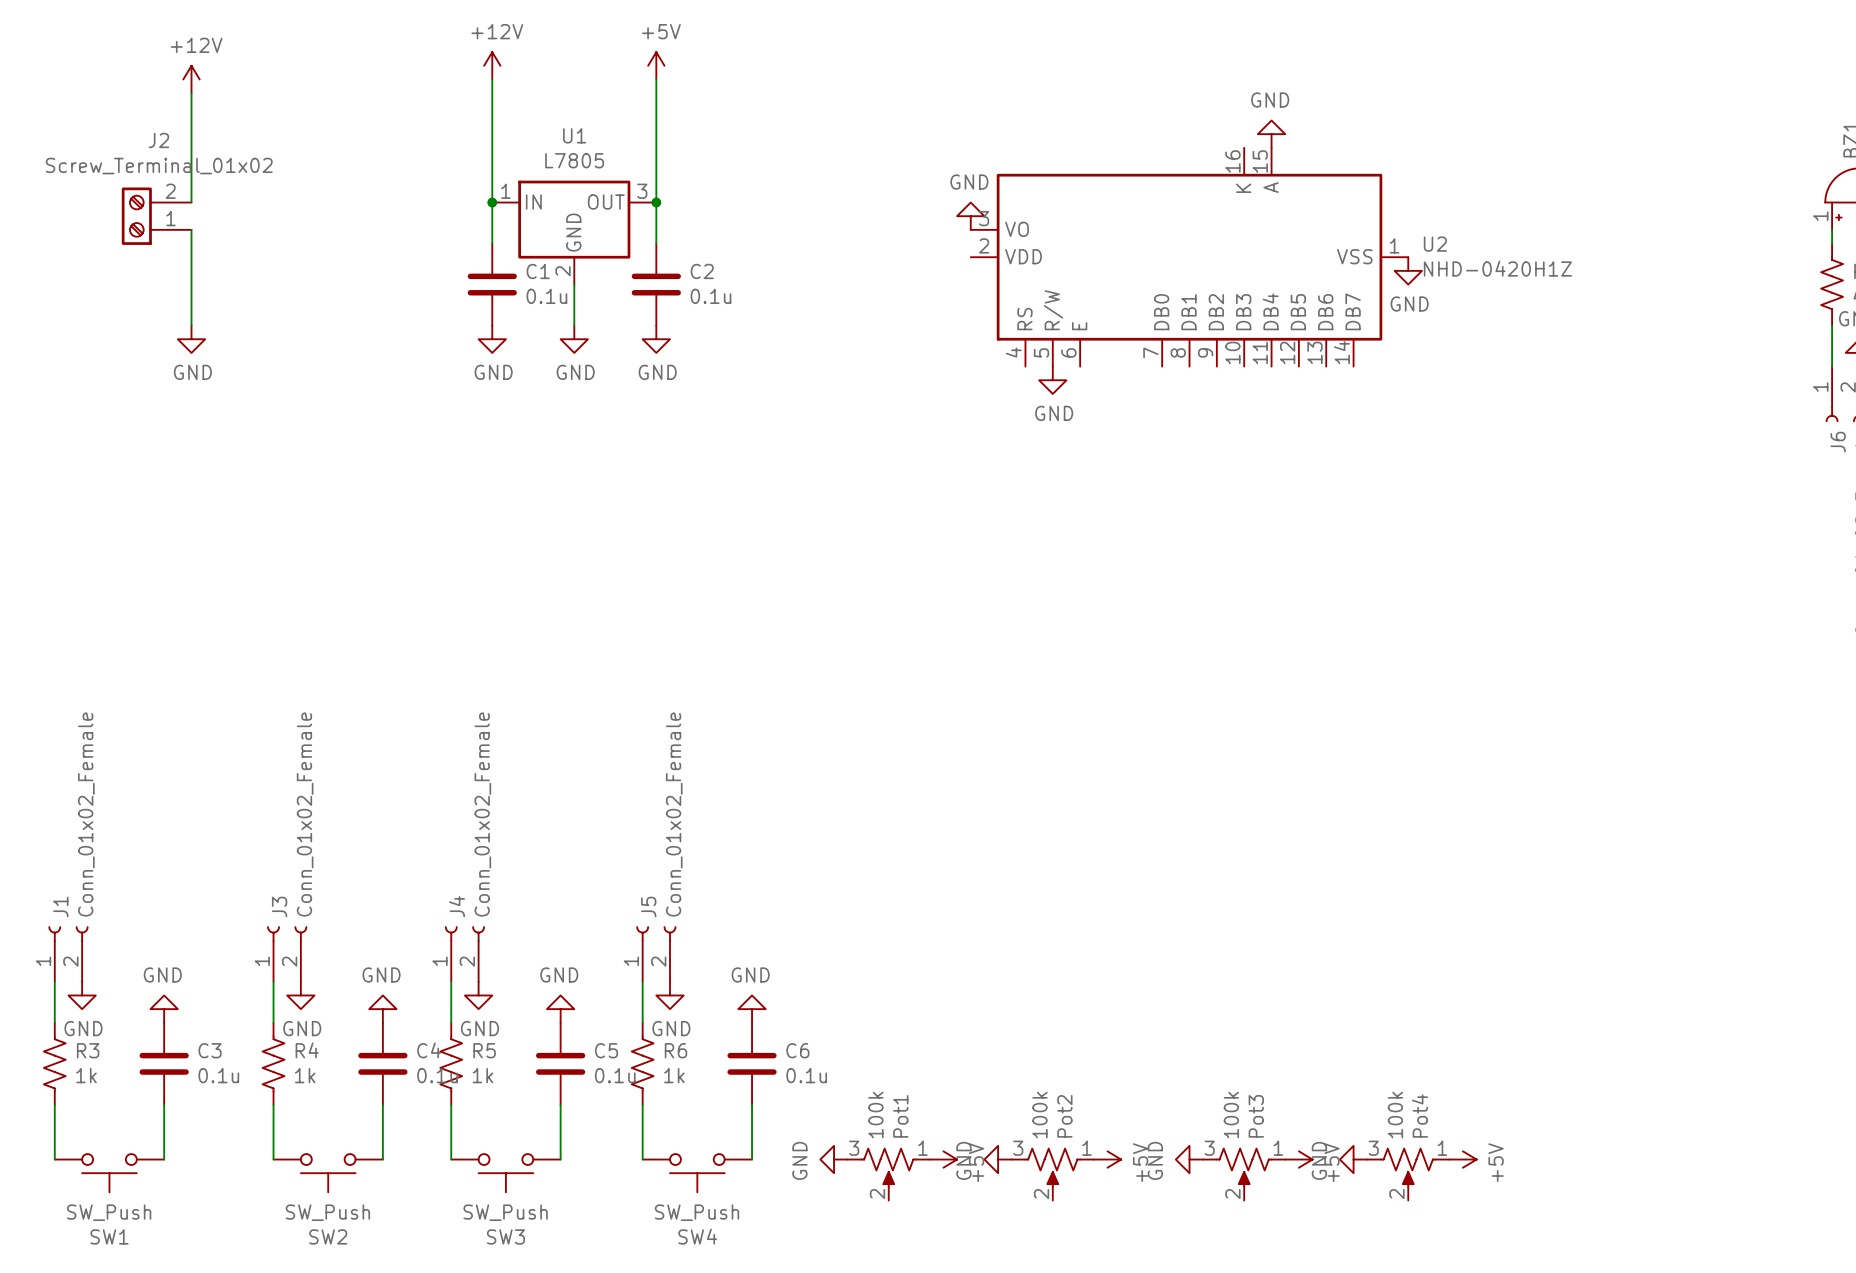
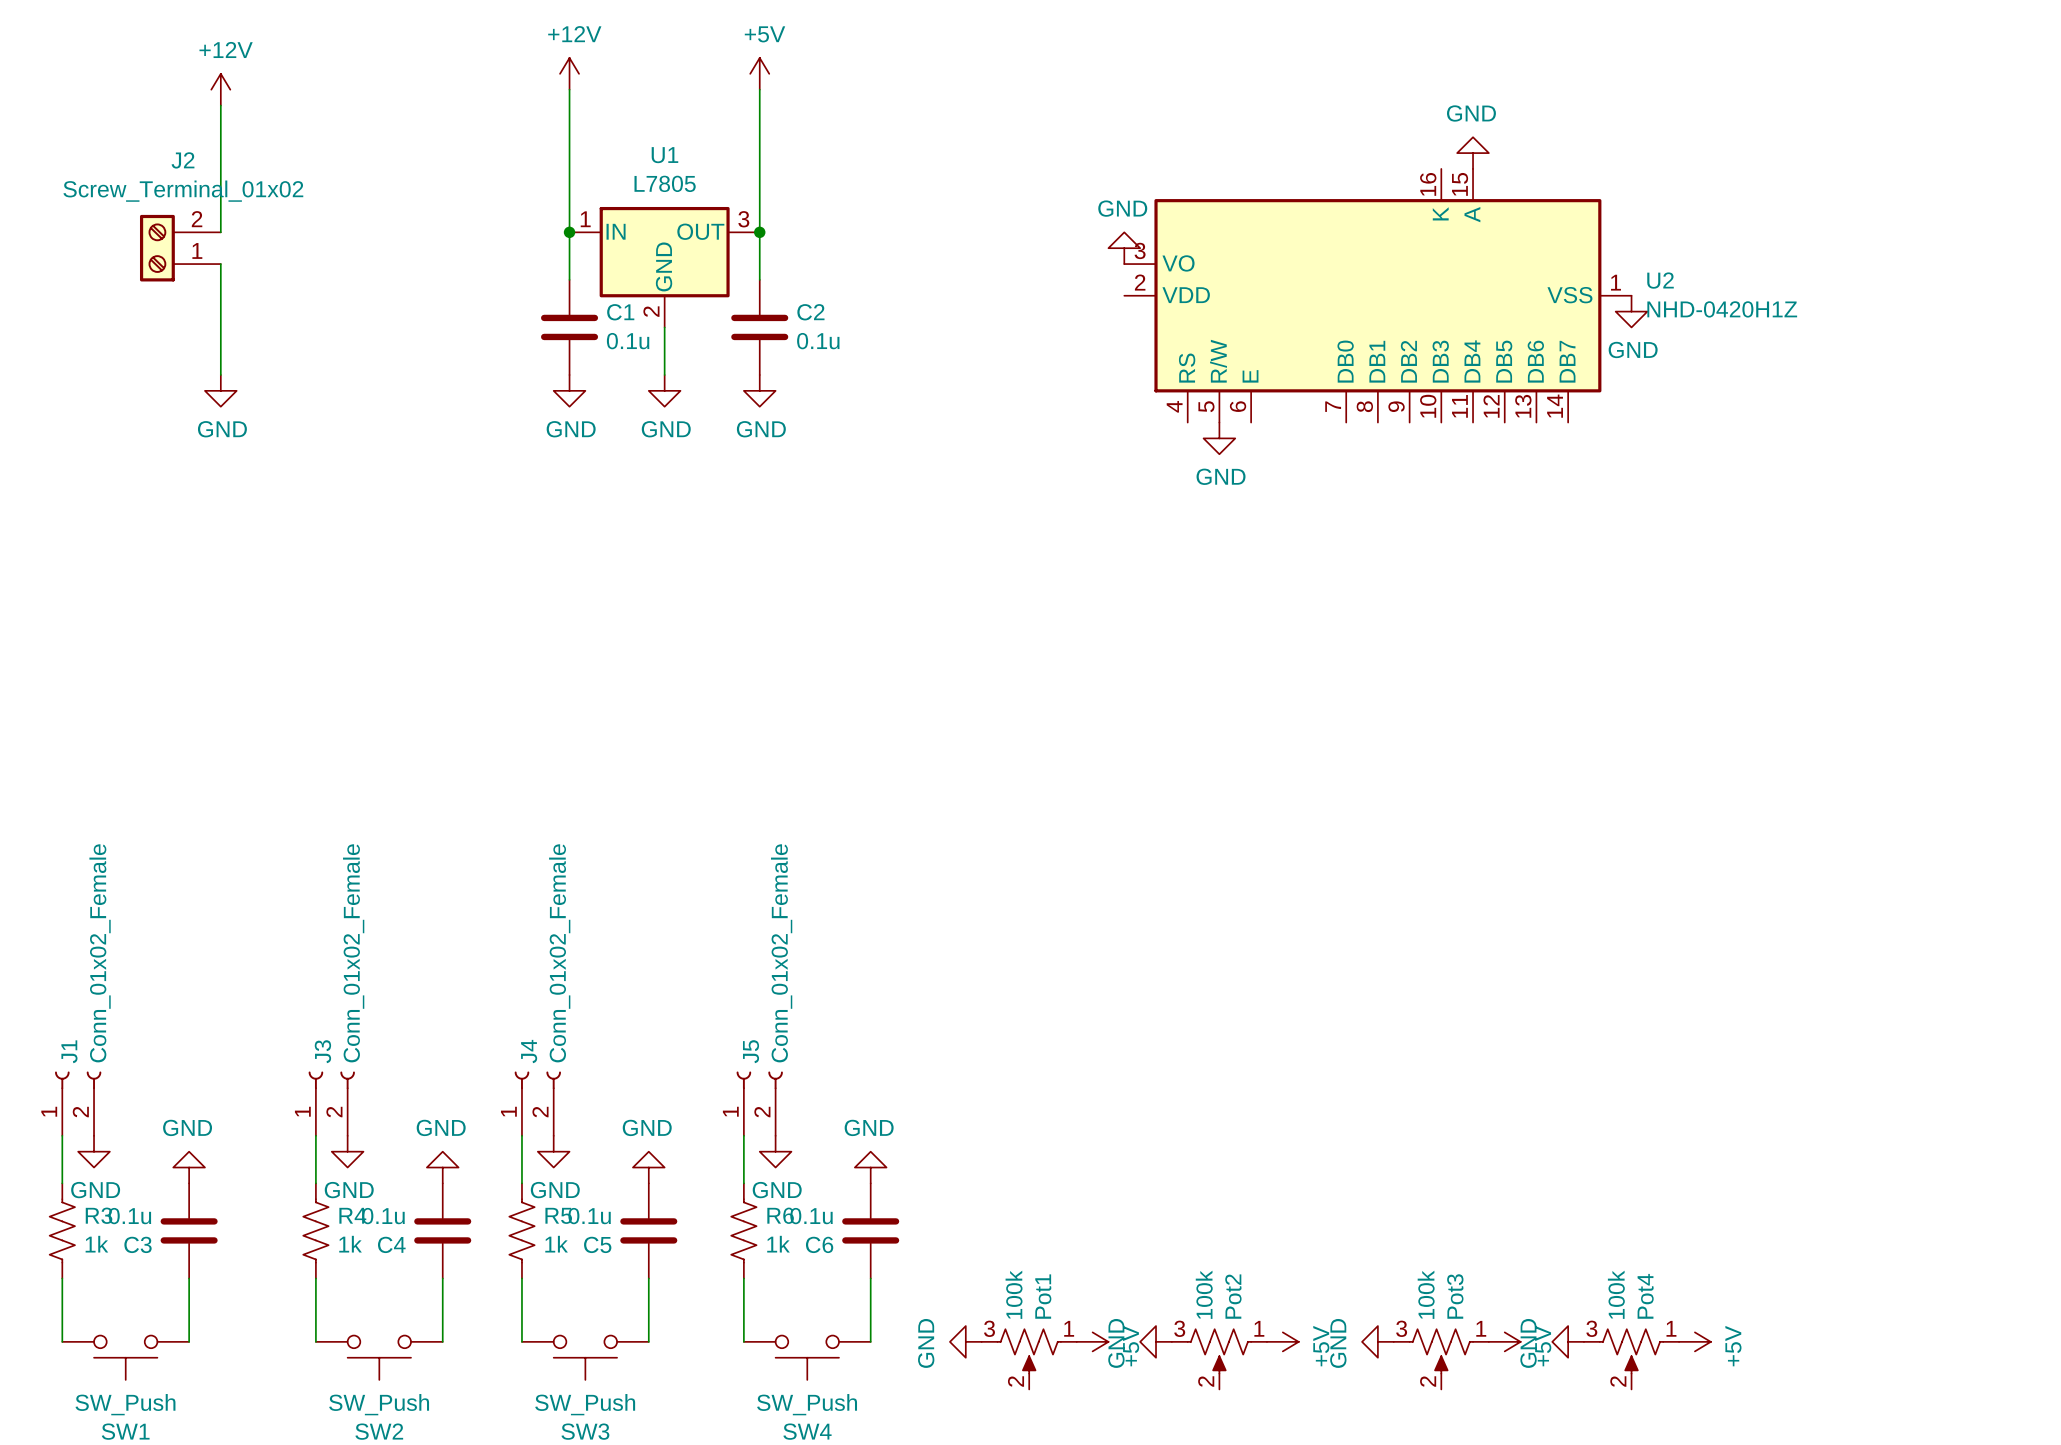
C3 name position: C3 (210, 1050) -> C3 (138, 1244)
C4 name position: C4 (429, 1050) -> C4 (391, 1244)
C5 name position: C5 (606, 1050) -> C5 (597, 1244)
C6 name position: C6 (797, 1050) -> C6 (819, 1244)
C3 value position: 0.1u (218, 1075) -> 0.1u (129, 1216)
C4 value position: 0.1u (437, 1075) -> 0.1u (383, 1216)
C5 value position: 0.1u (615, 1075) -> 0.1u (589, 1216)
C6 value position: 0.1u (806, 1075) -> 0.1u (811, 1216)

